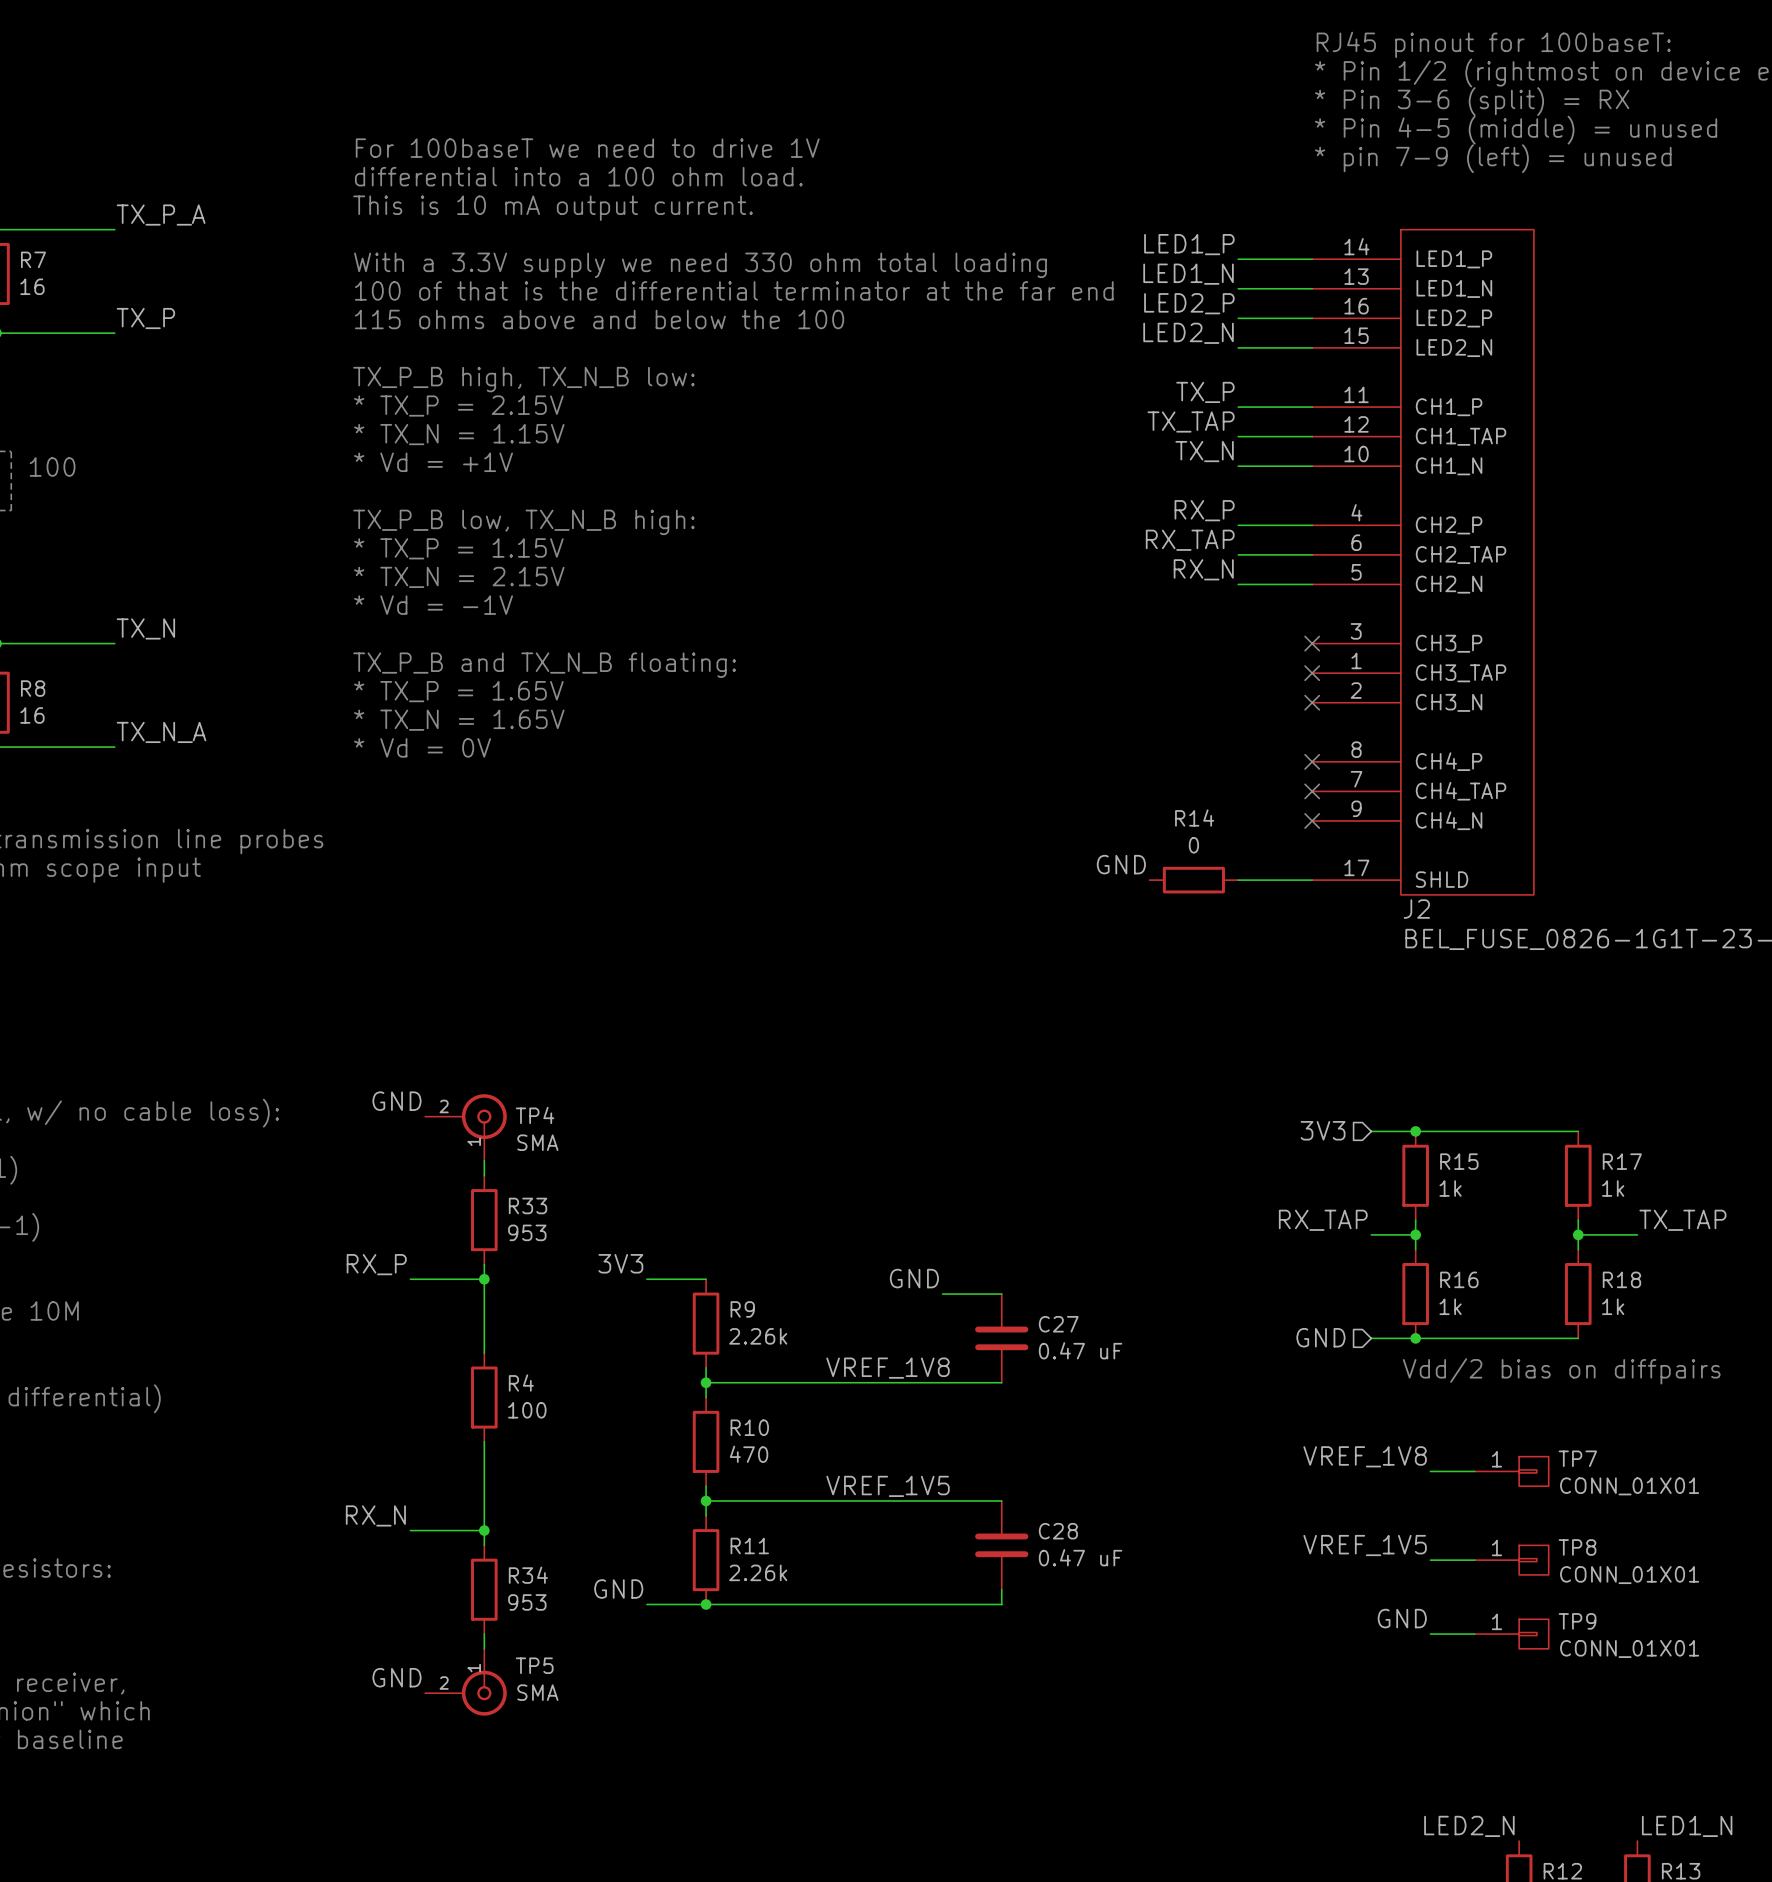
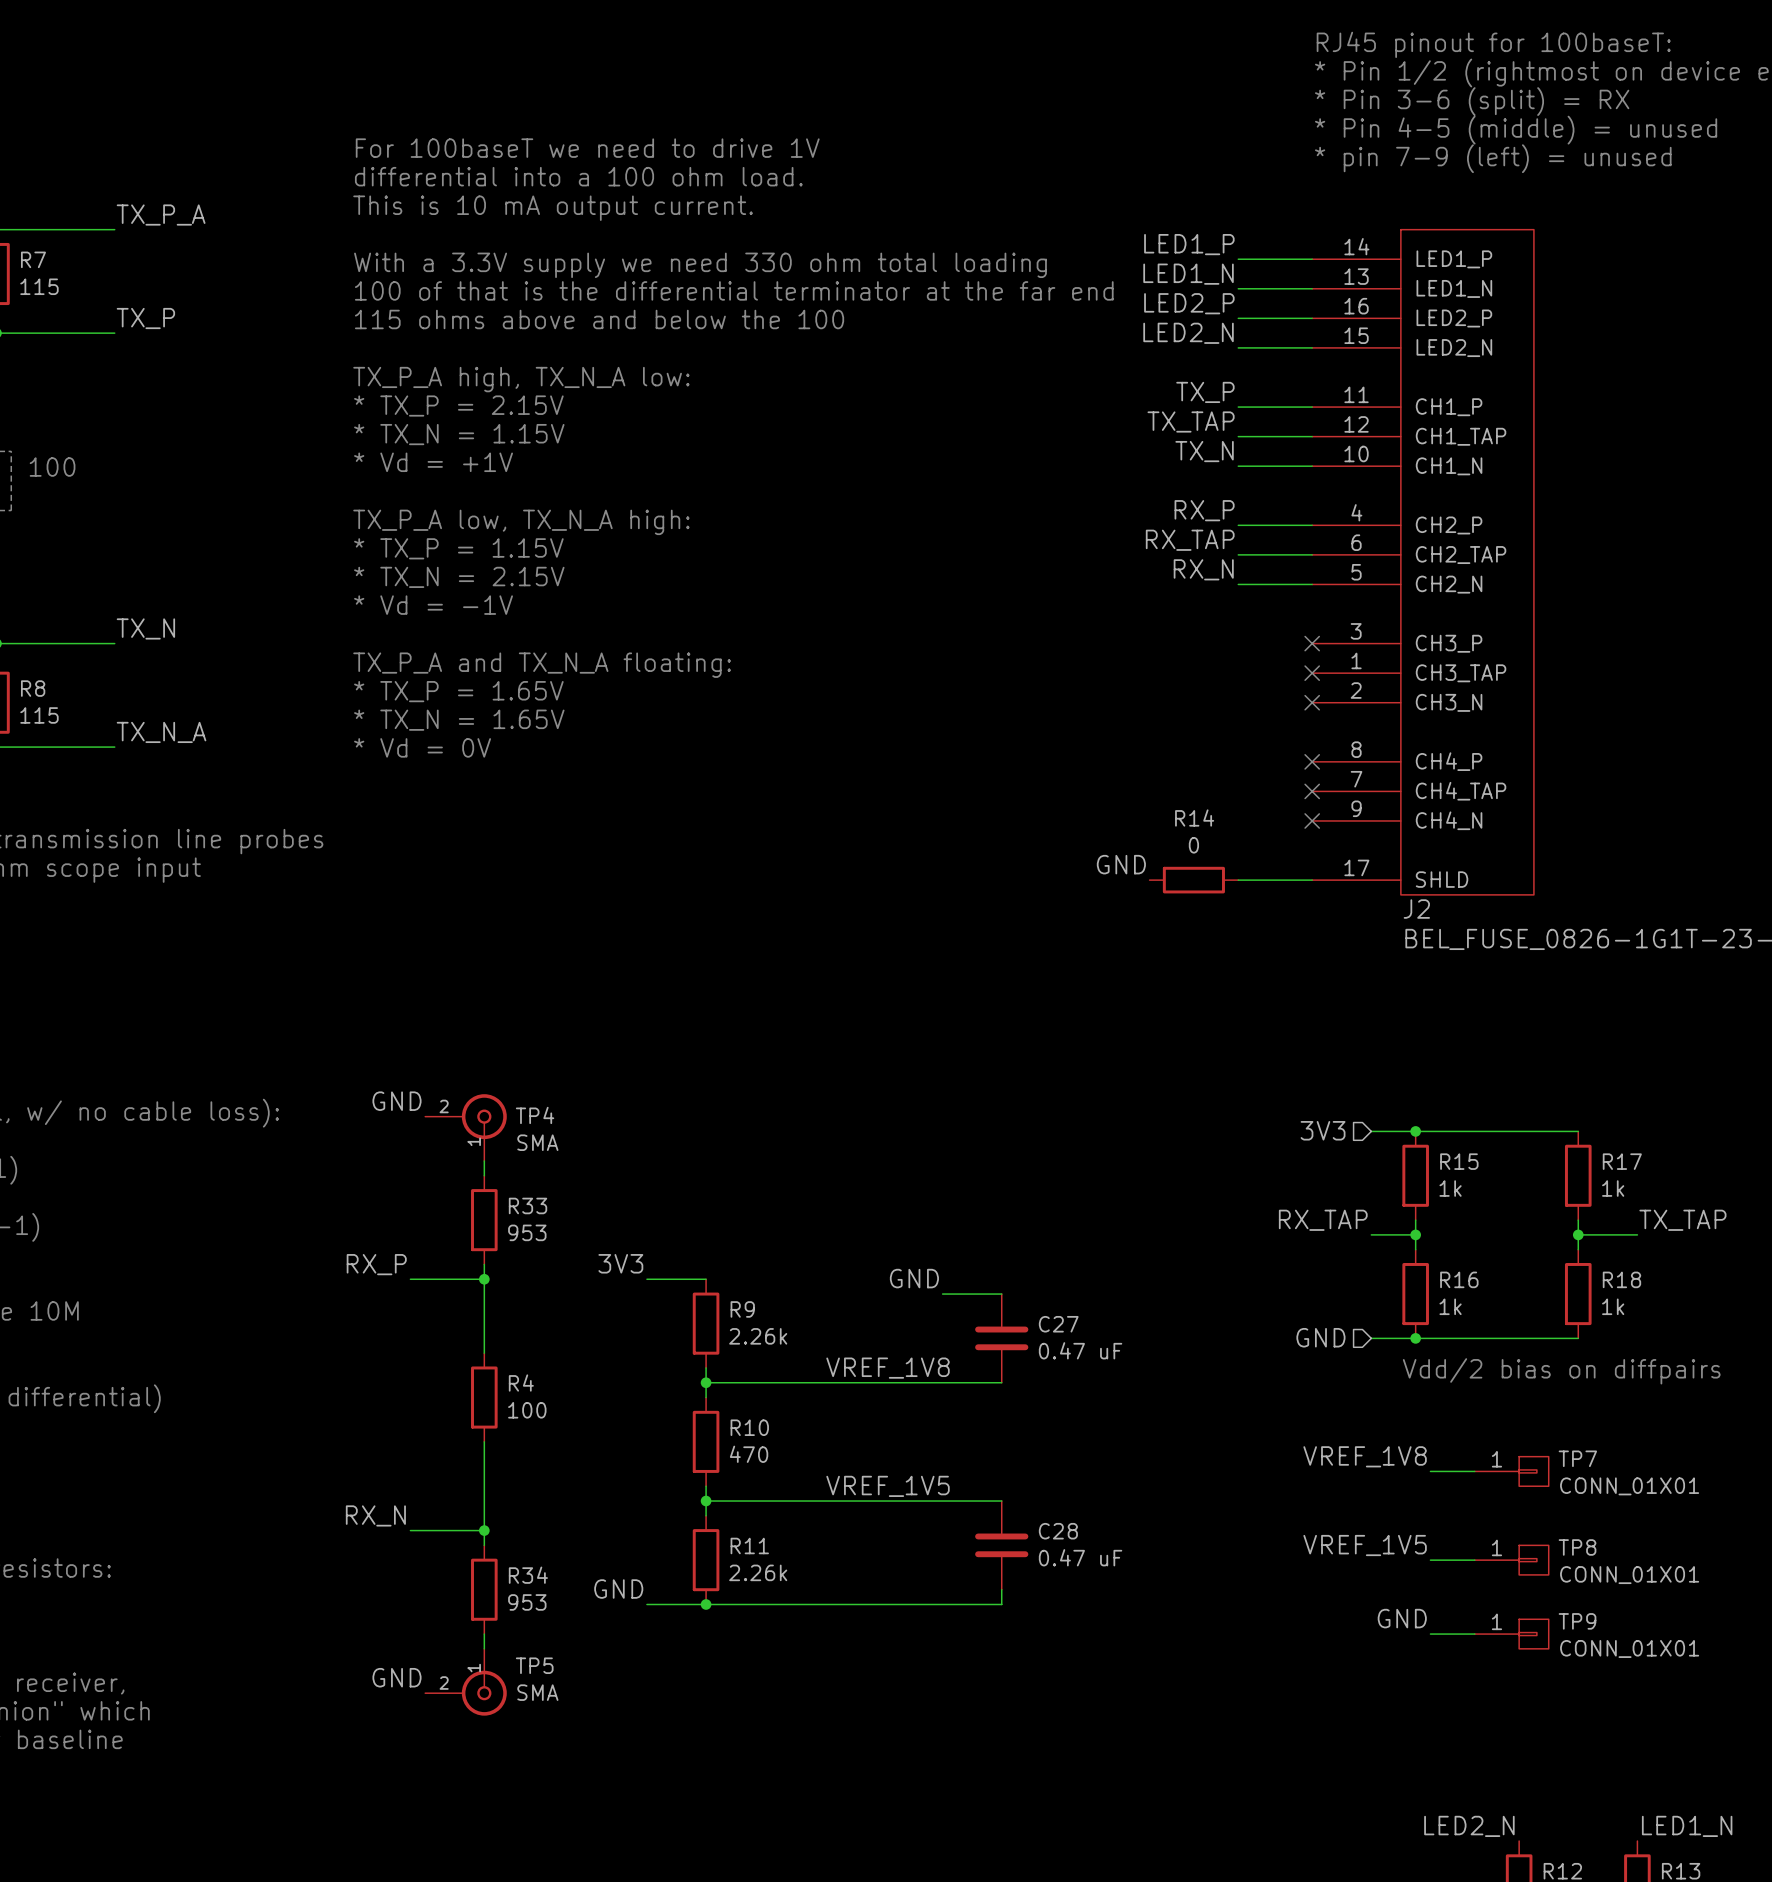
R7 value: 16 (32, 286) -> 115 (39, 286)
text: TX_P_B high, TX_N_B low: (523, 379) -> TX_P_A high, TX_N_A low: (521, 379)
text: TX_P_B low, TX_N_B high: (523, 522) -> TX_P_A low, TX_N_A high: (521, 522)
text: TX_P_B and TX_N_B floating: (544, 665) -> TX_P_A and TX_N_A floating: (542, 665)
R8 value: 16 (32, 715) -> 115 (39, 715)

